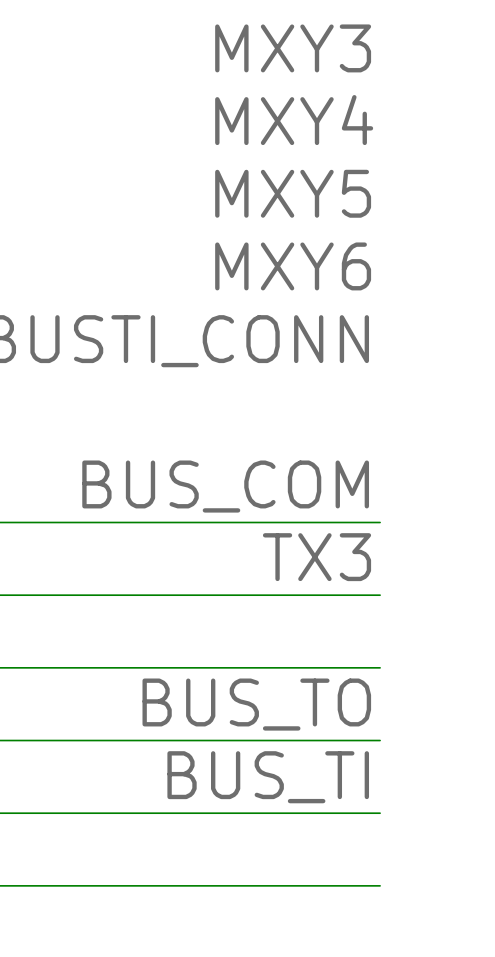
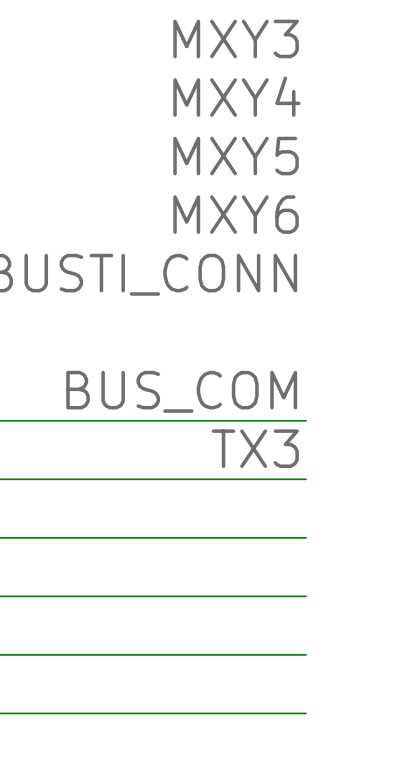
label: BUS_TO (256, 704) -> none
label: BUS_TI (268, 777) -> none

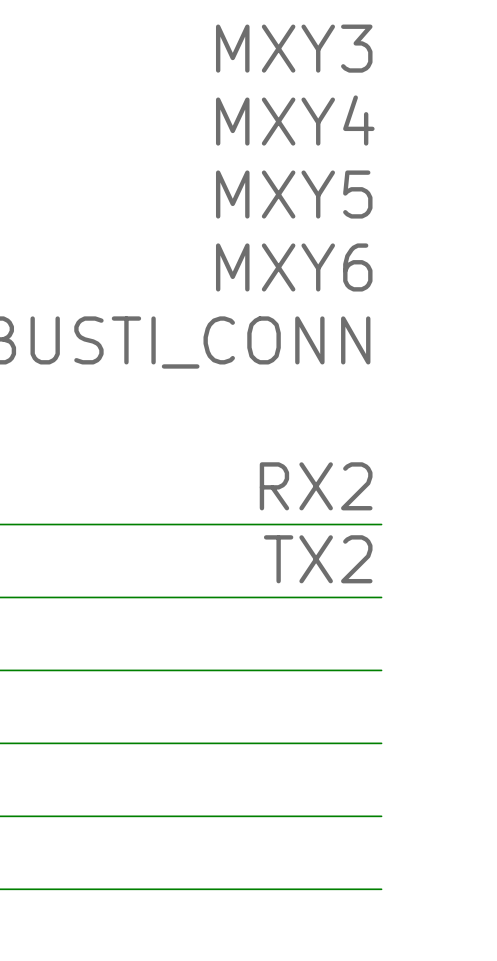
label: BUS_COM (181, 391) -> RX2 (316, 486)
label: TX3 (255, 448) -> TX2 (318, 559)

